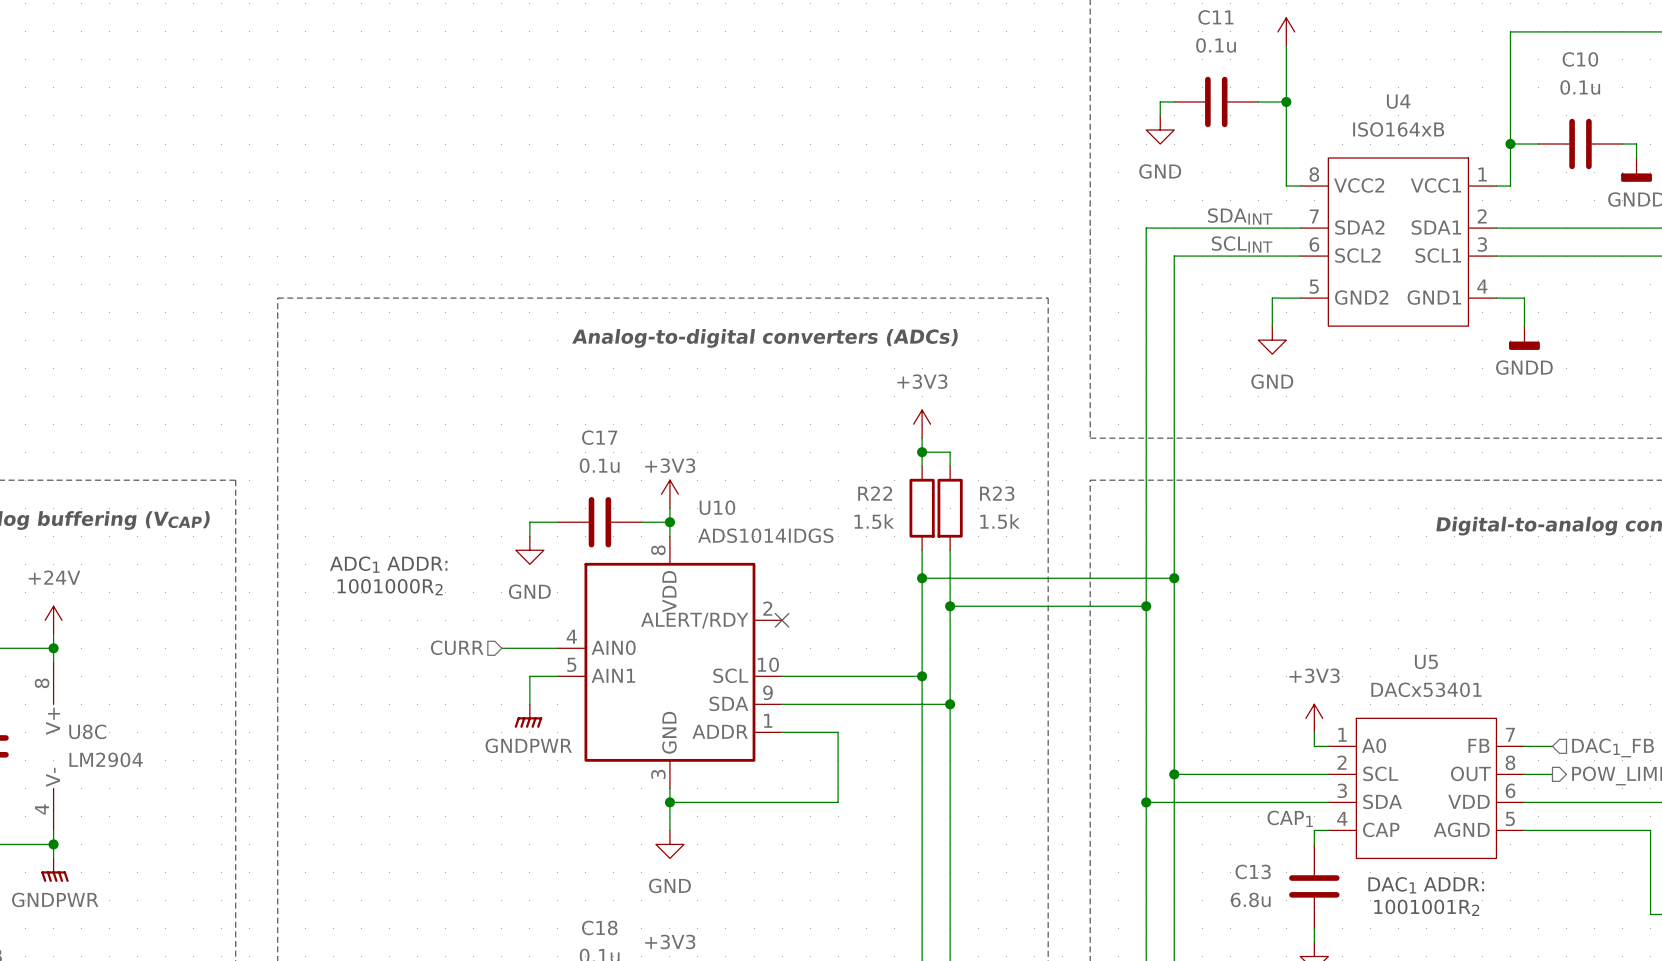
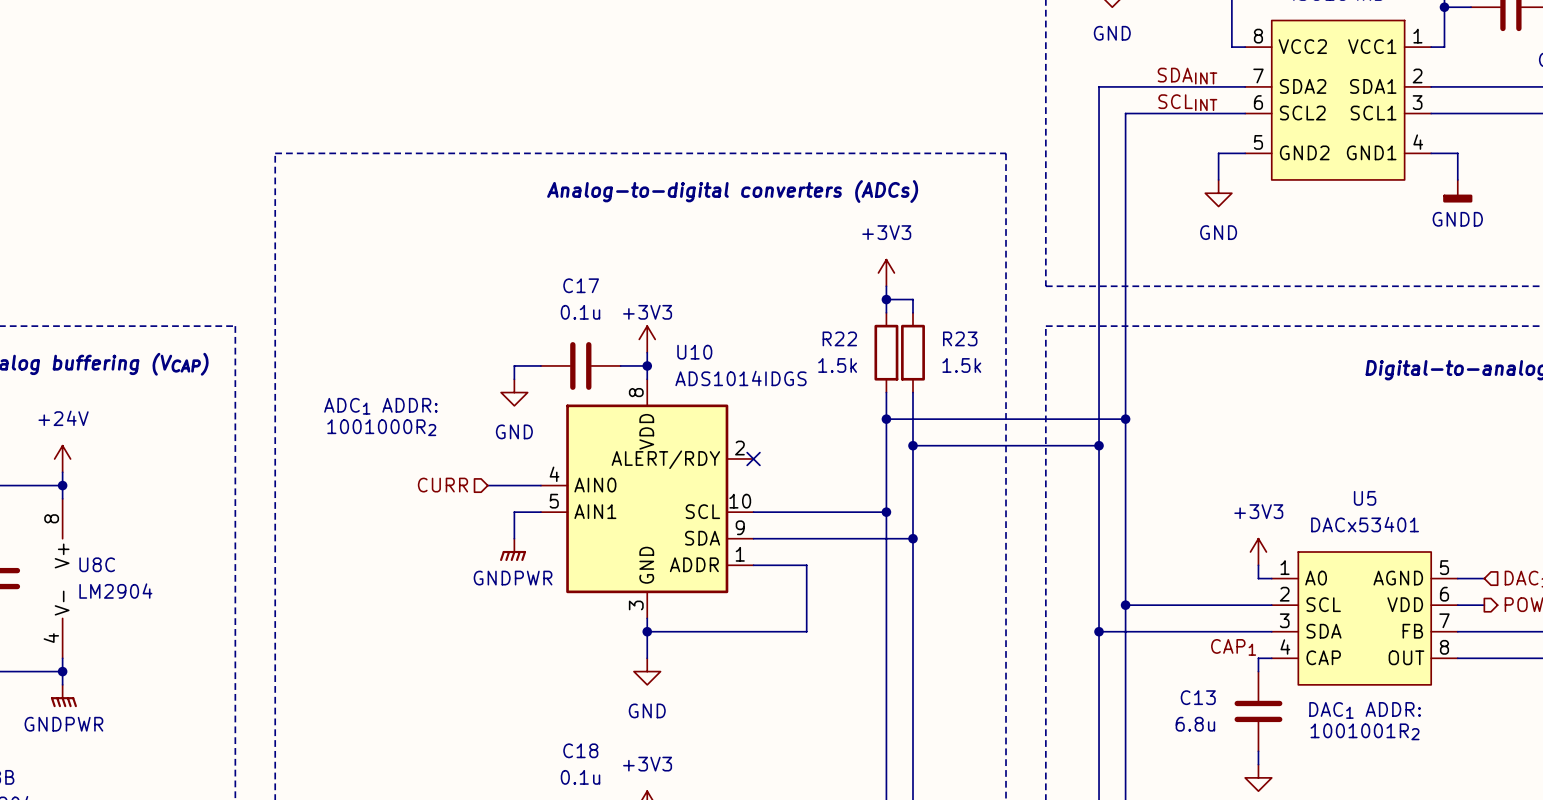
U5 pin number: 7 (1510, 734) -> 5 (1444, 567)
U5 pin name: FB (1478, 745) -> AGND (1398, 578)
U5 pin number: 8 (1510, 762) -> 6 (1444, 594)
U5 pin name: OUT (1470, 773) -> VDD (1405, 604)
U5 pin number: 6 (1510, 790) -> 7 (1444, 620)
U5 pin name: VDD (1468, 801) -> FB (1412, 631)
U5 pin number: 5 (1510, 818) -> 8 (1444, 647)
U5 pin name: AGND (1461, 829) -> OUT (1406, 657)

